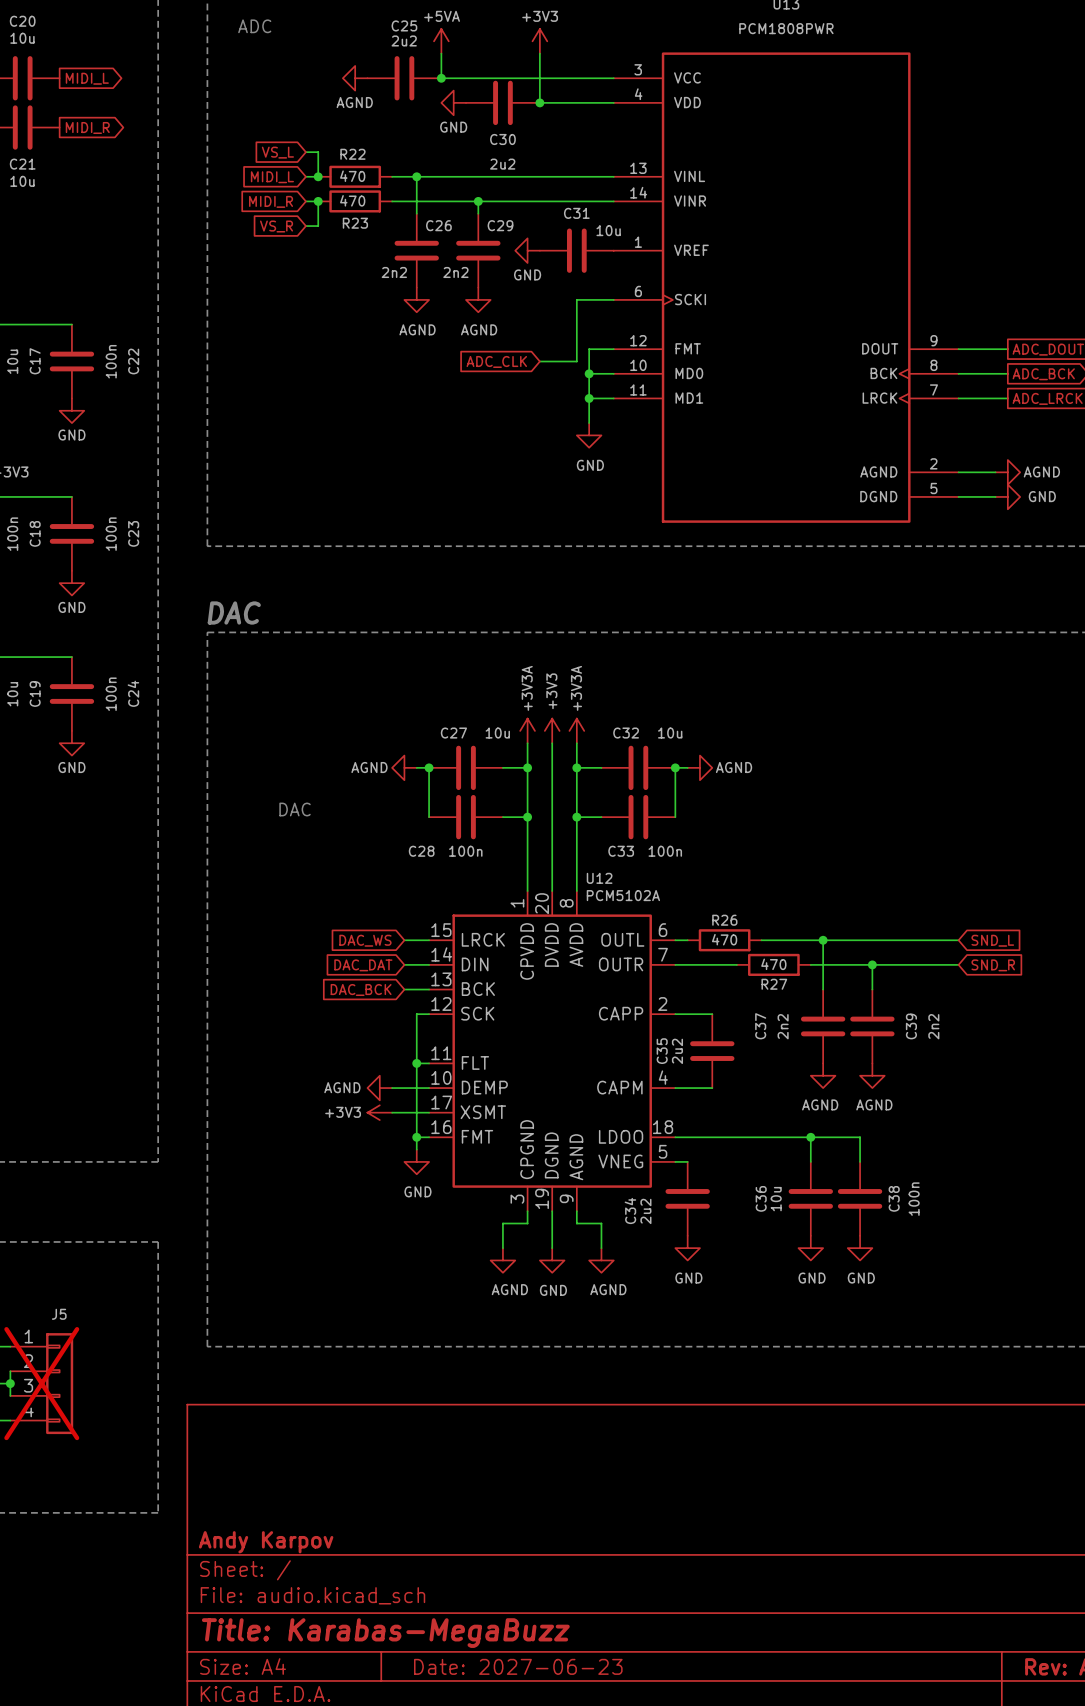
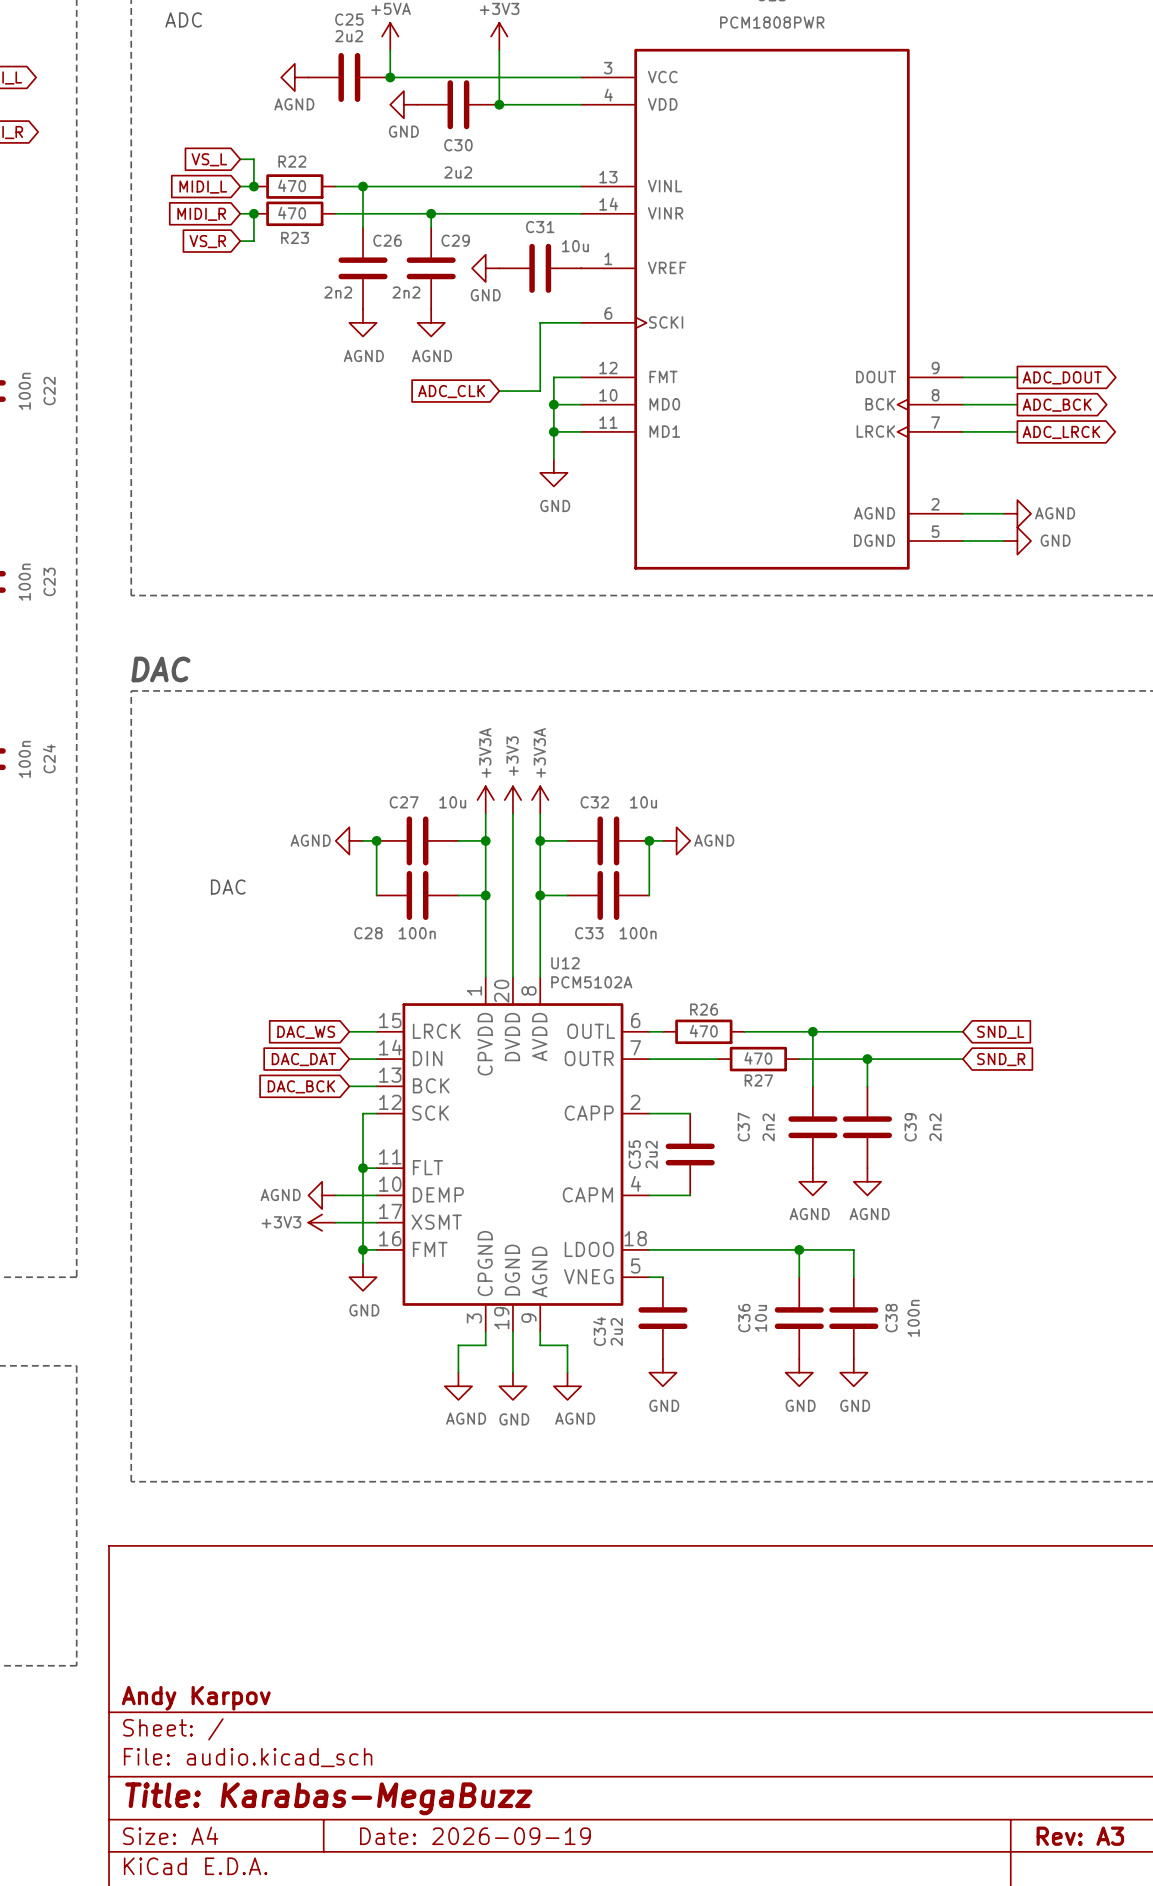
title block: Date: 2027-06-23 (518, 1666) -> Date: 2026-09-19 (475, 1836)

